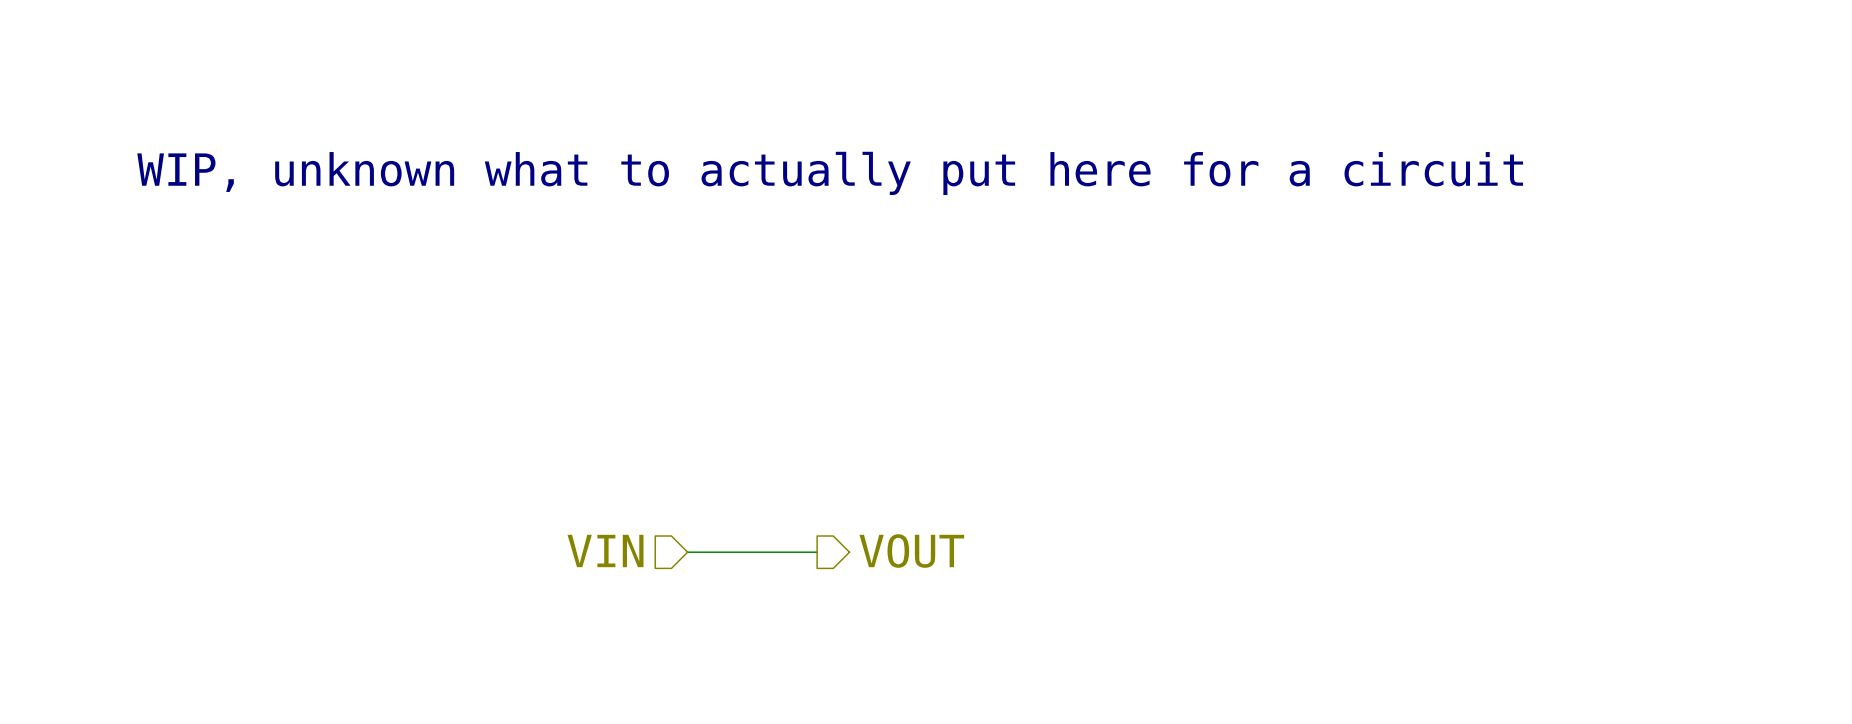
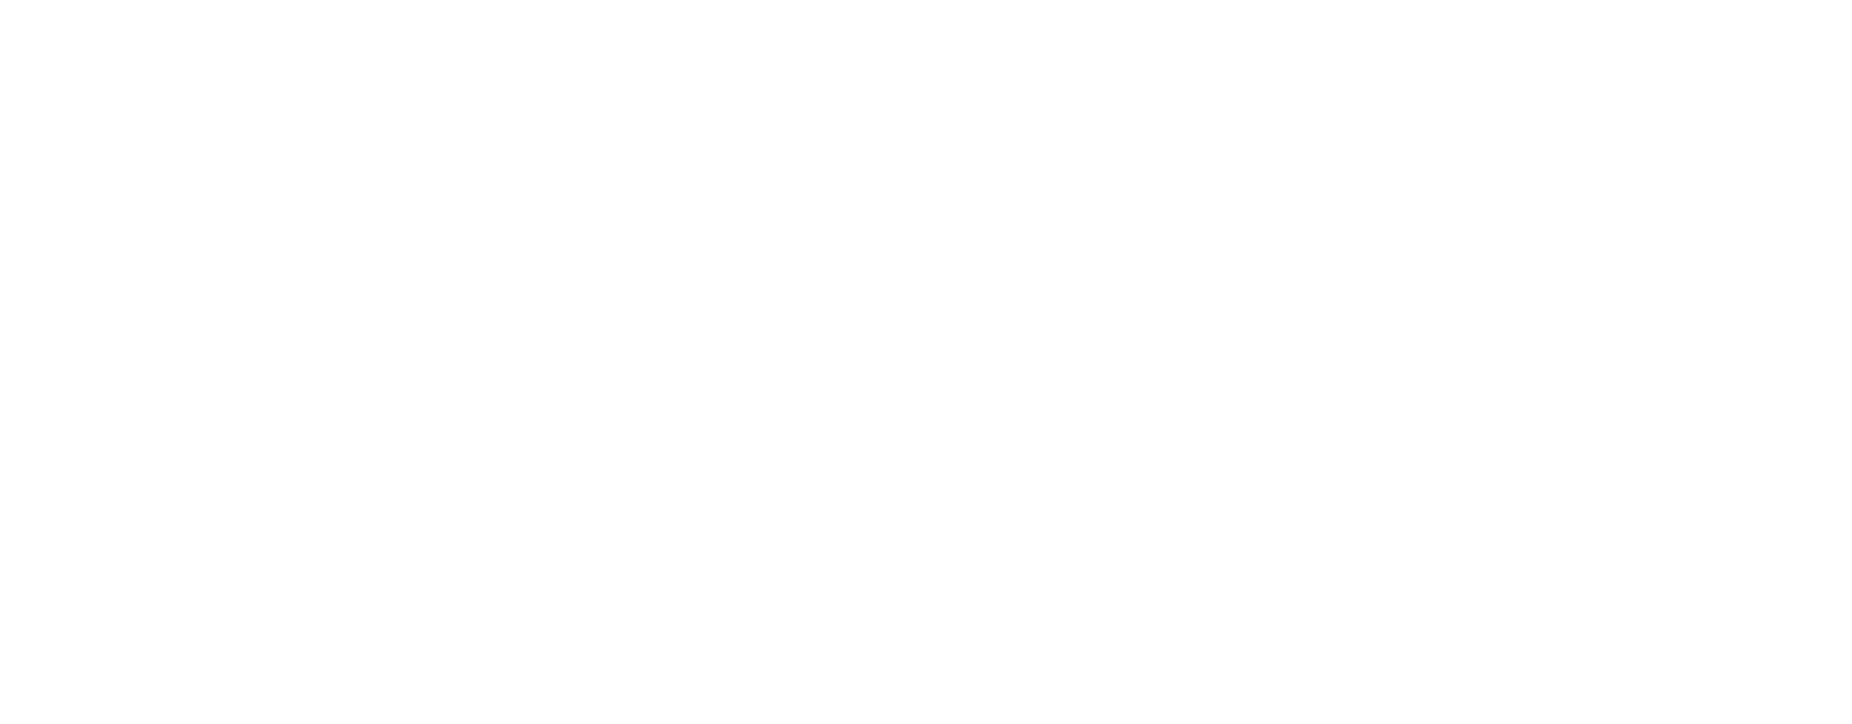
text: WIP, unknown what to actually put here for a circuit (830, 173) -> none
hierarchical label: VIN (605, 550) -> none
hierarchical label: VOUT (911, 551) -> none
wire: (687, 552) (817, 552) -> none

